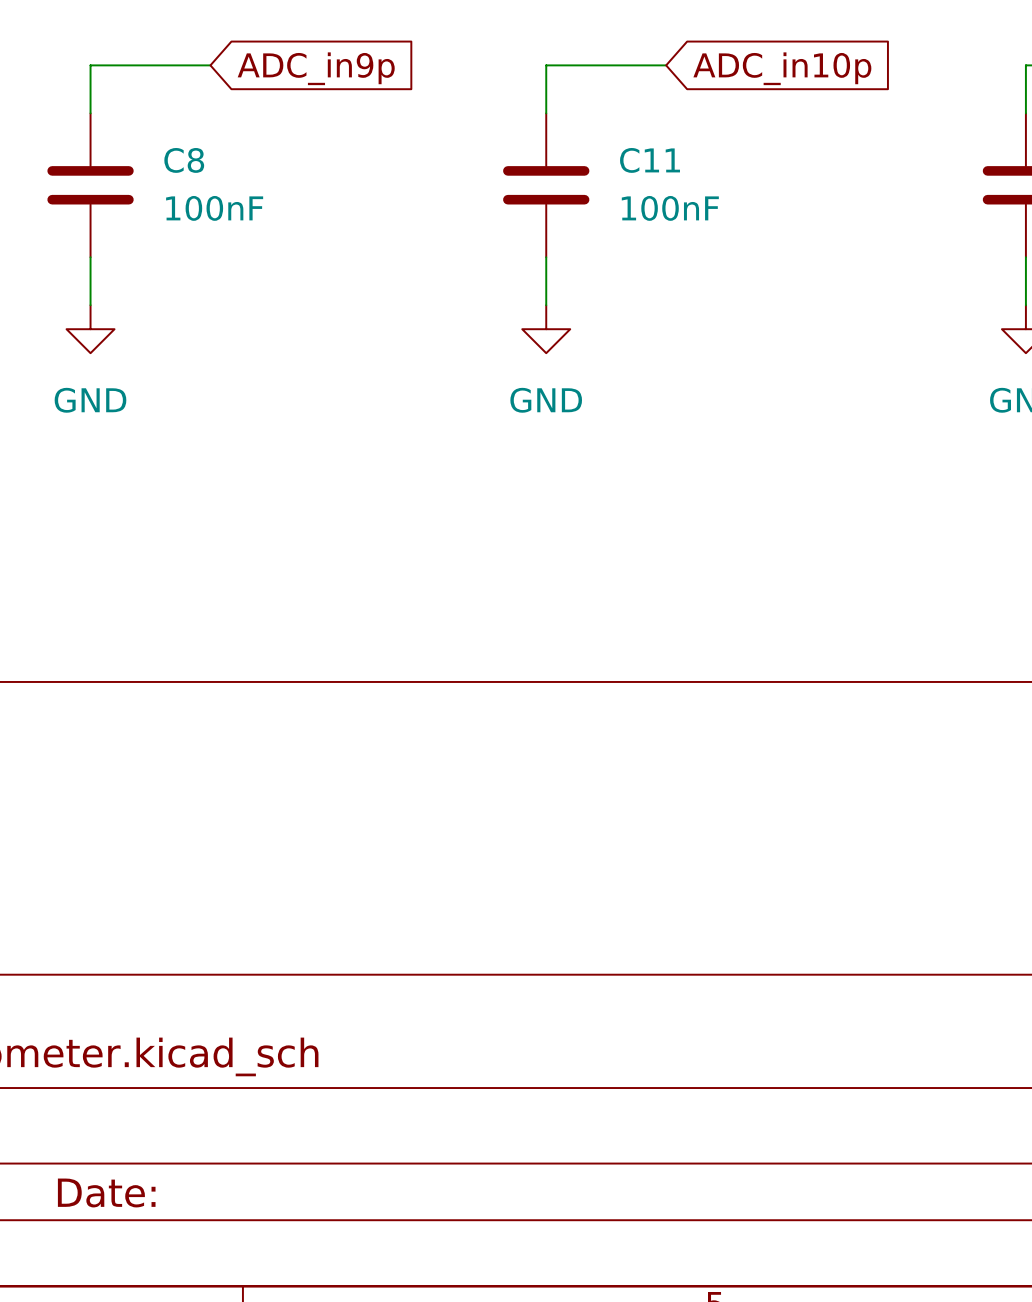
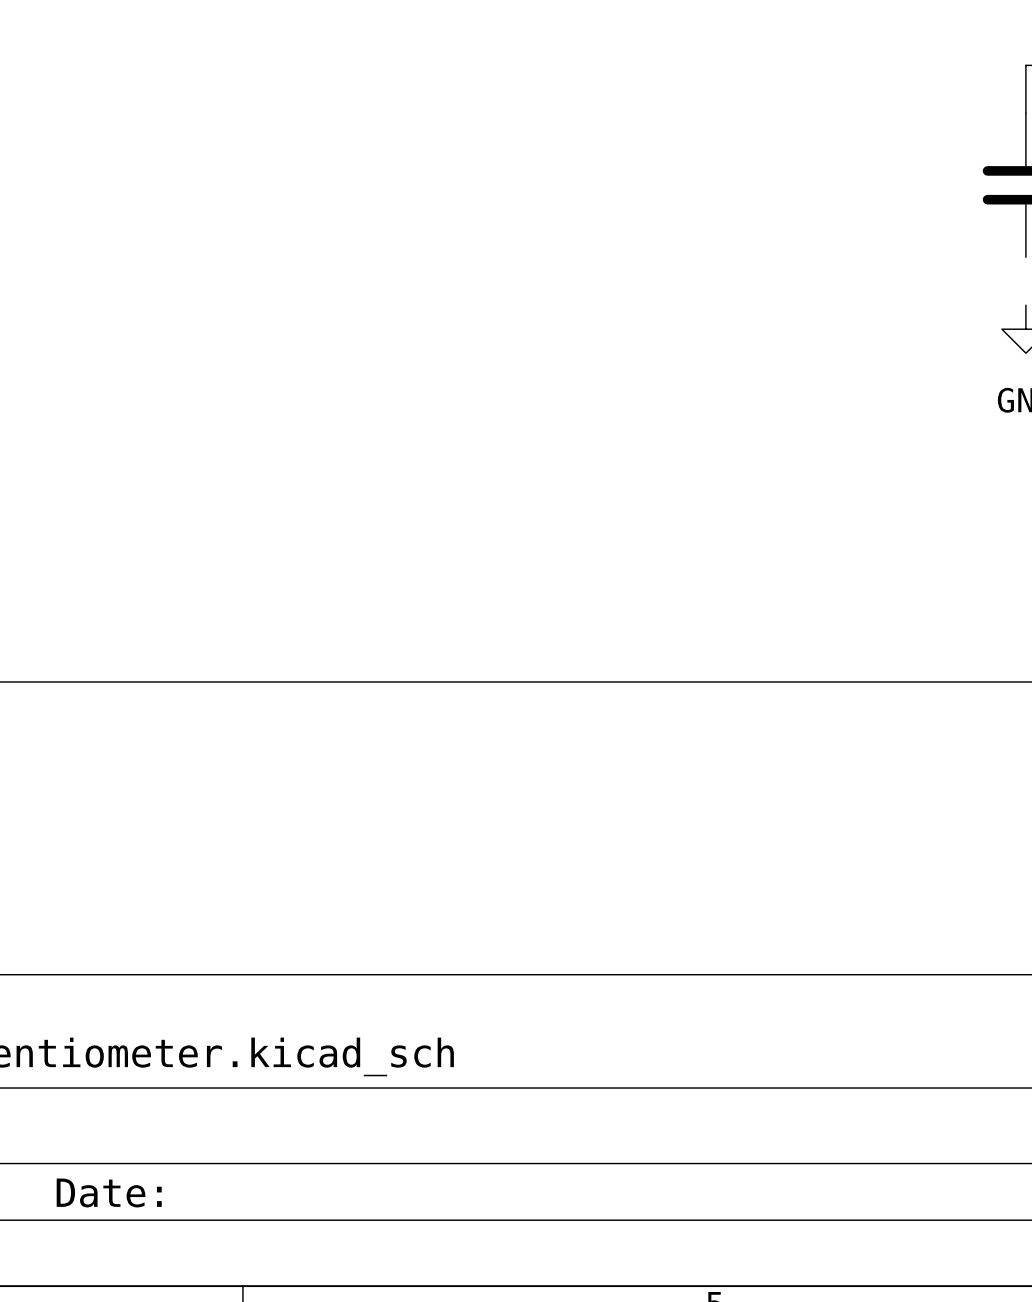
wire: (210, 65) (90, 65) (90, 113) -> none
wire: (666, 65) (546, 65) (546, 113) -> none
global label: ADC_in9p (316, 68) -> none
global label: ADC_in10p (782, 68) -> none
C8: 100nF (90, 185) -> none
C11: 100nF (546, 185) -> none
wire: (90, 257) (90, 305) -> none
wire: (546, 257) (546, 305) -> none
wire: (1025, 257) (1025, 305) -> none
power symbol: GND (90, 329) -> none
power symbol: GND (546, 329) -> none

